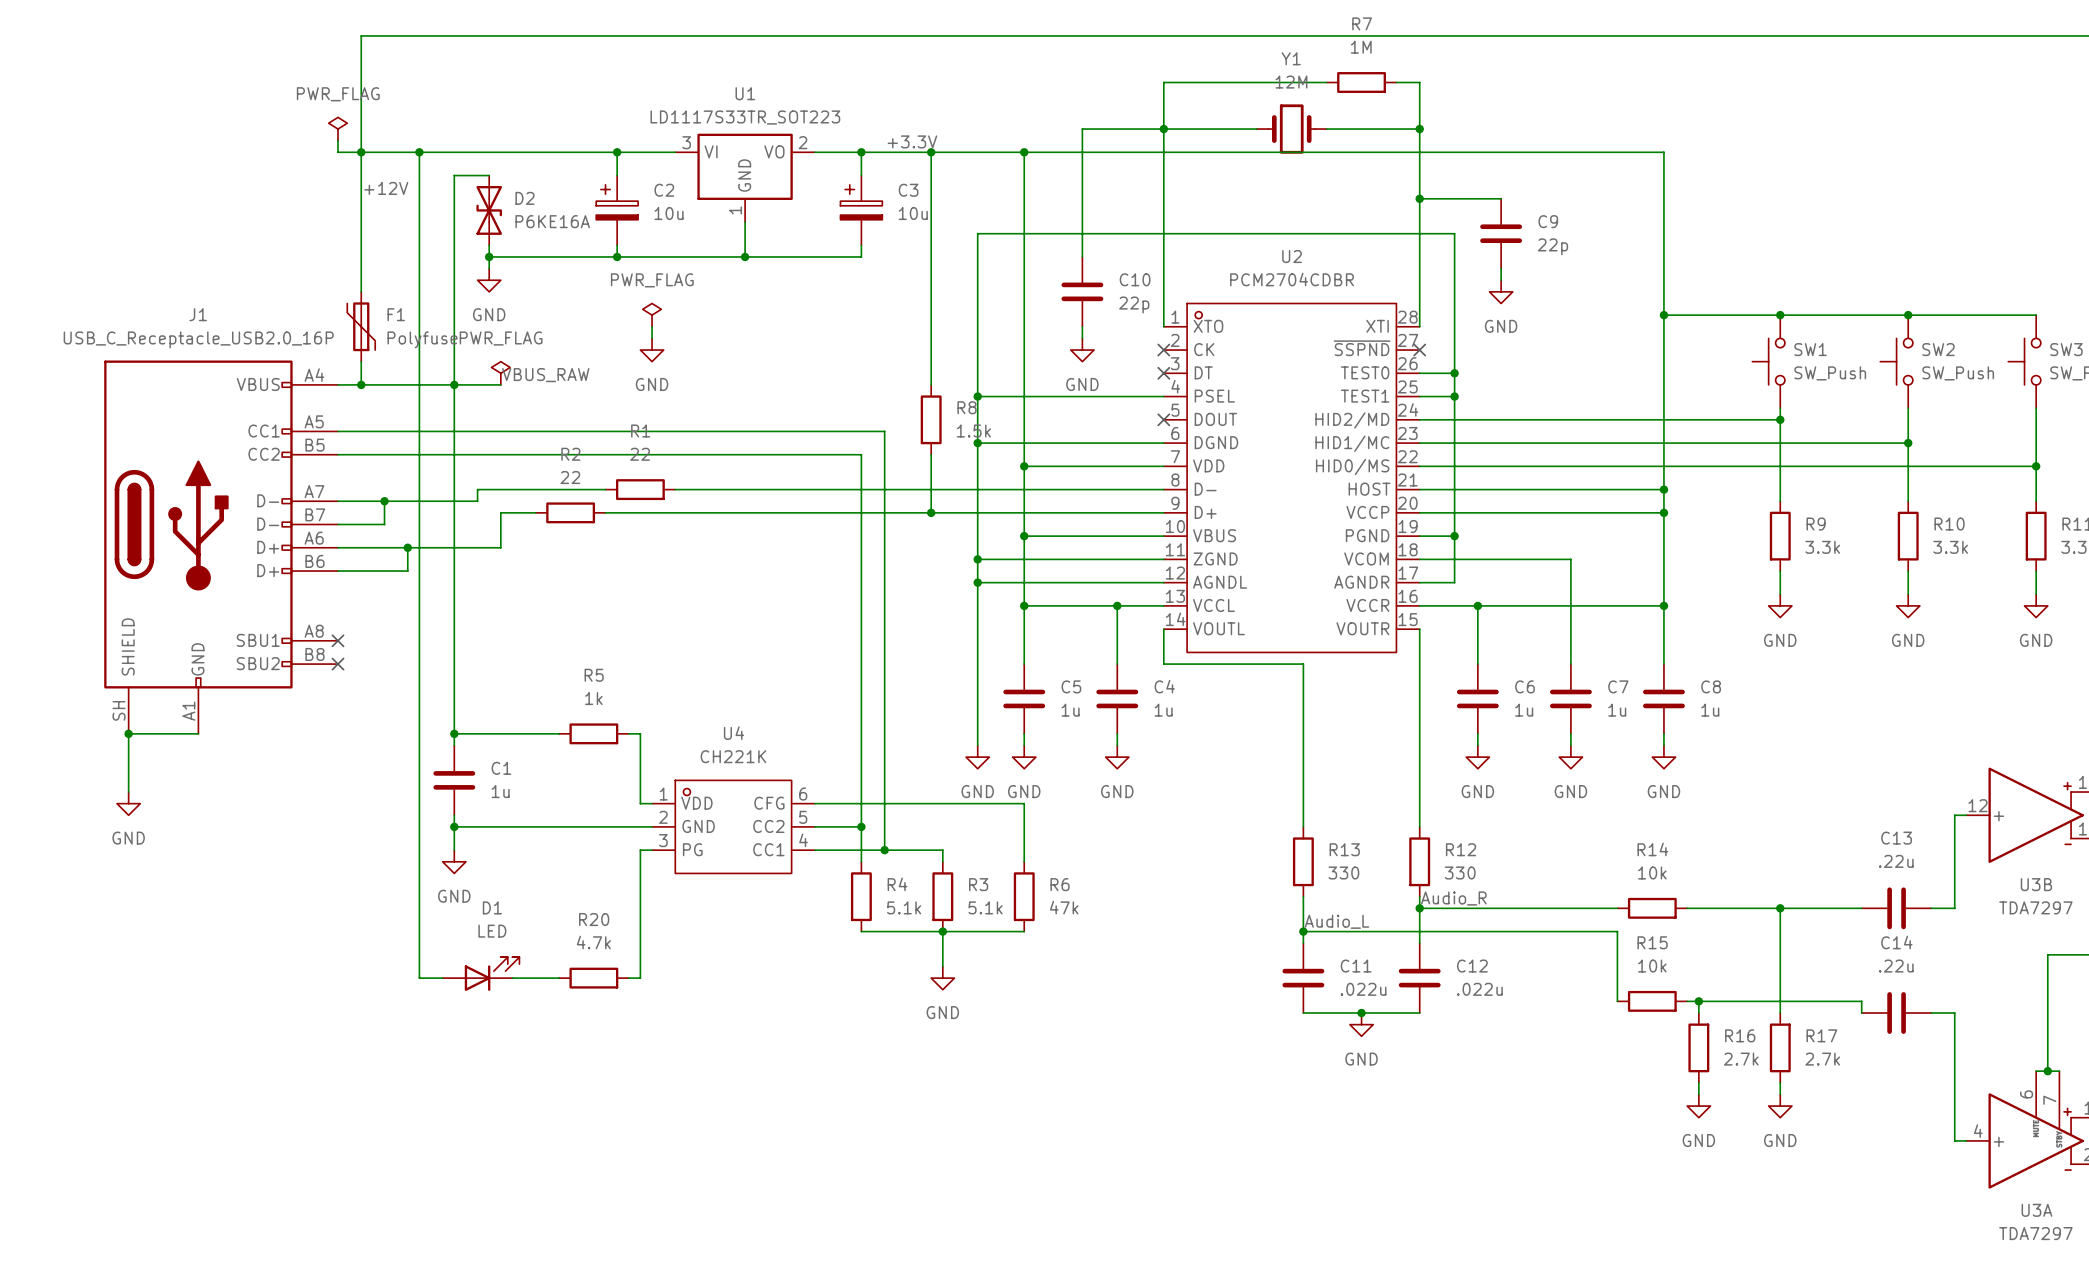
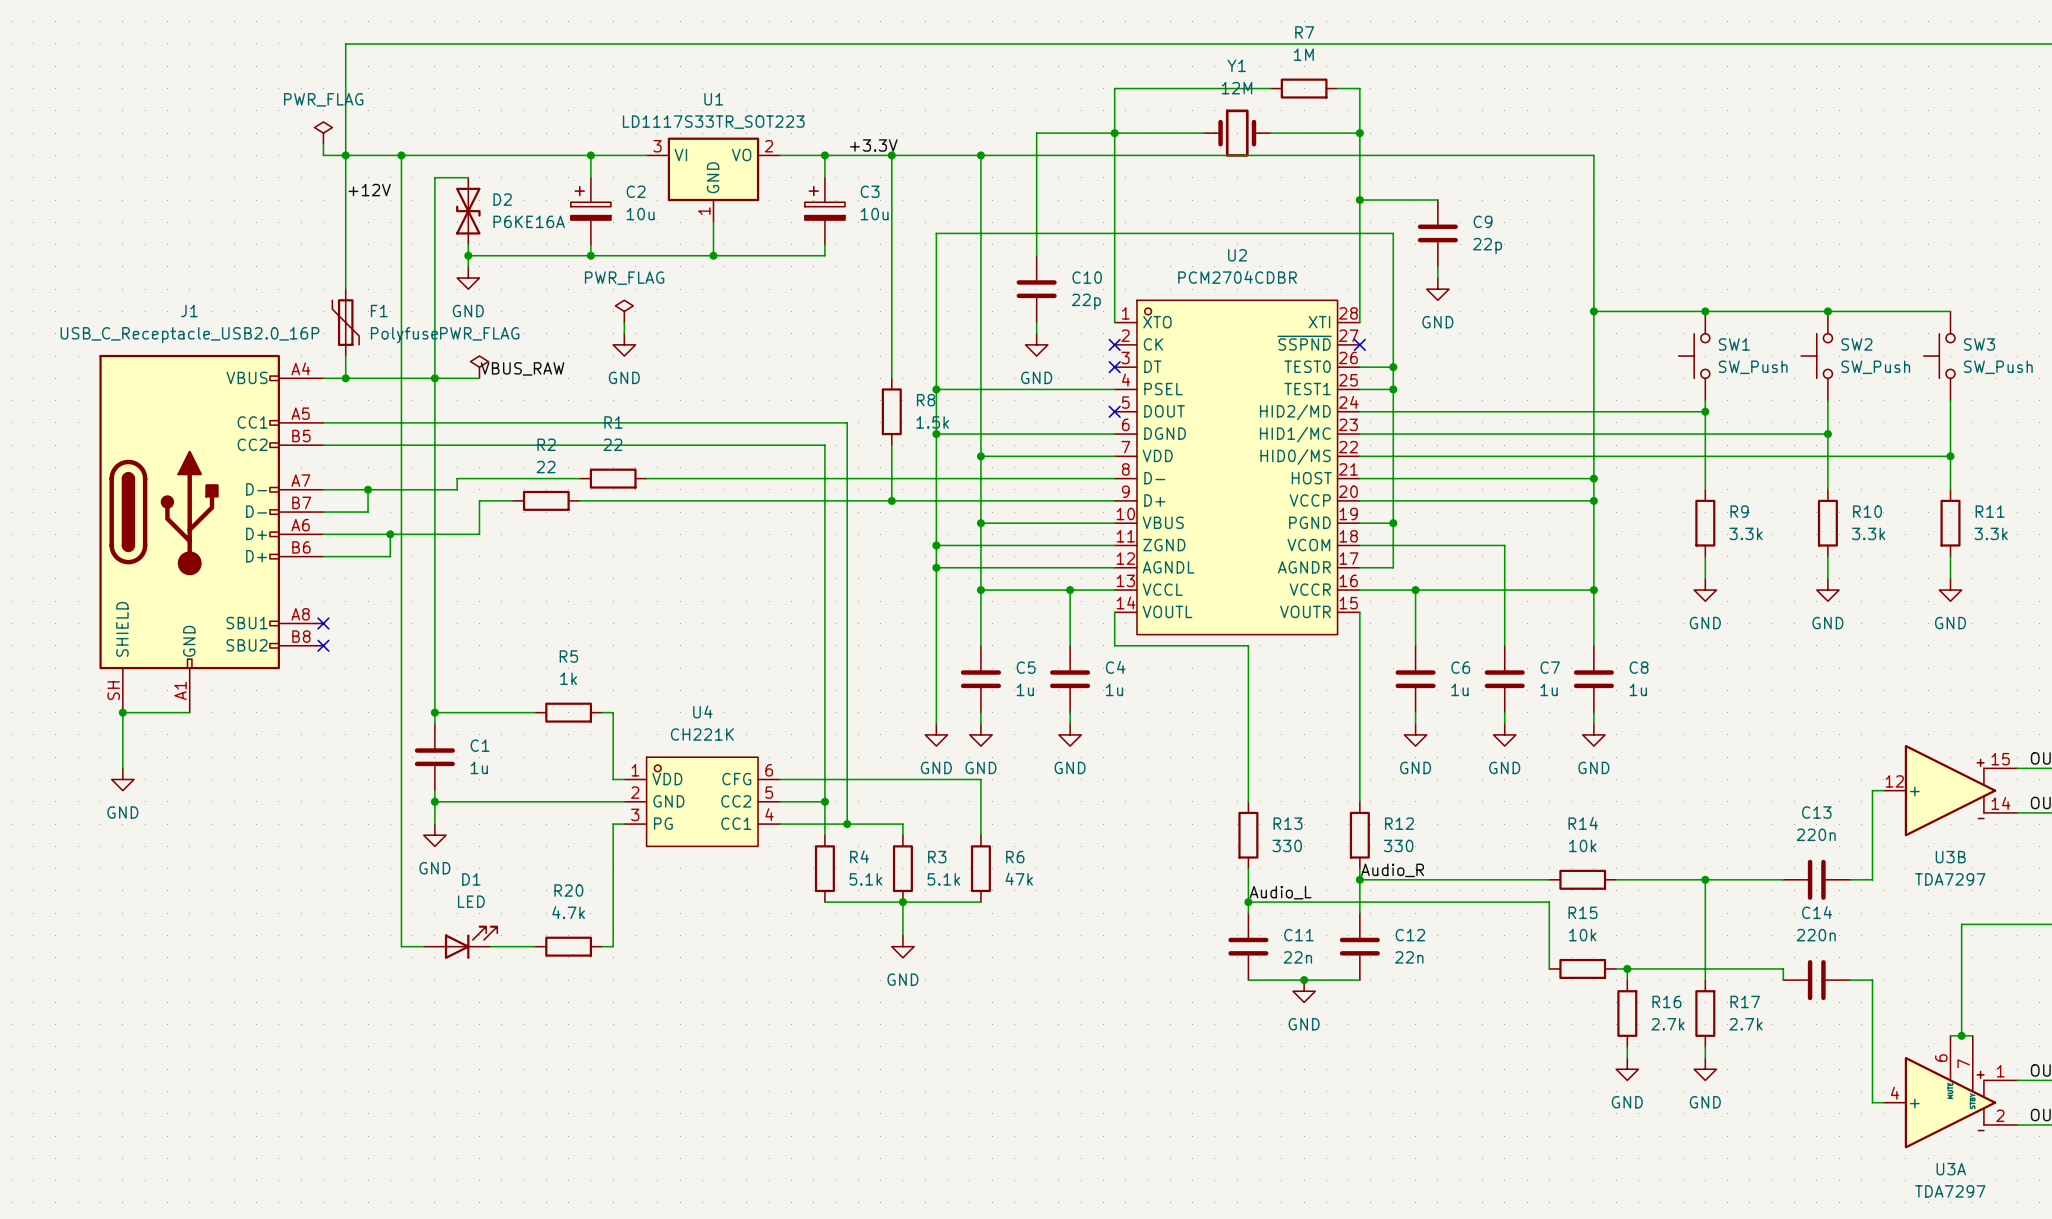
C13 value: .22u (1896, 861) -> 220n (1816, 834)
C14 value: .22u (1896, 966) -> 220n (1816, 935)
C11 value: .022u (1363, 989) -> 22n (1297, 957)
C12 value: .022u (1479, 989) -> 22n (1409, 957)

